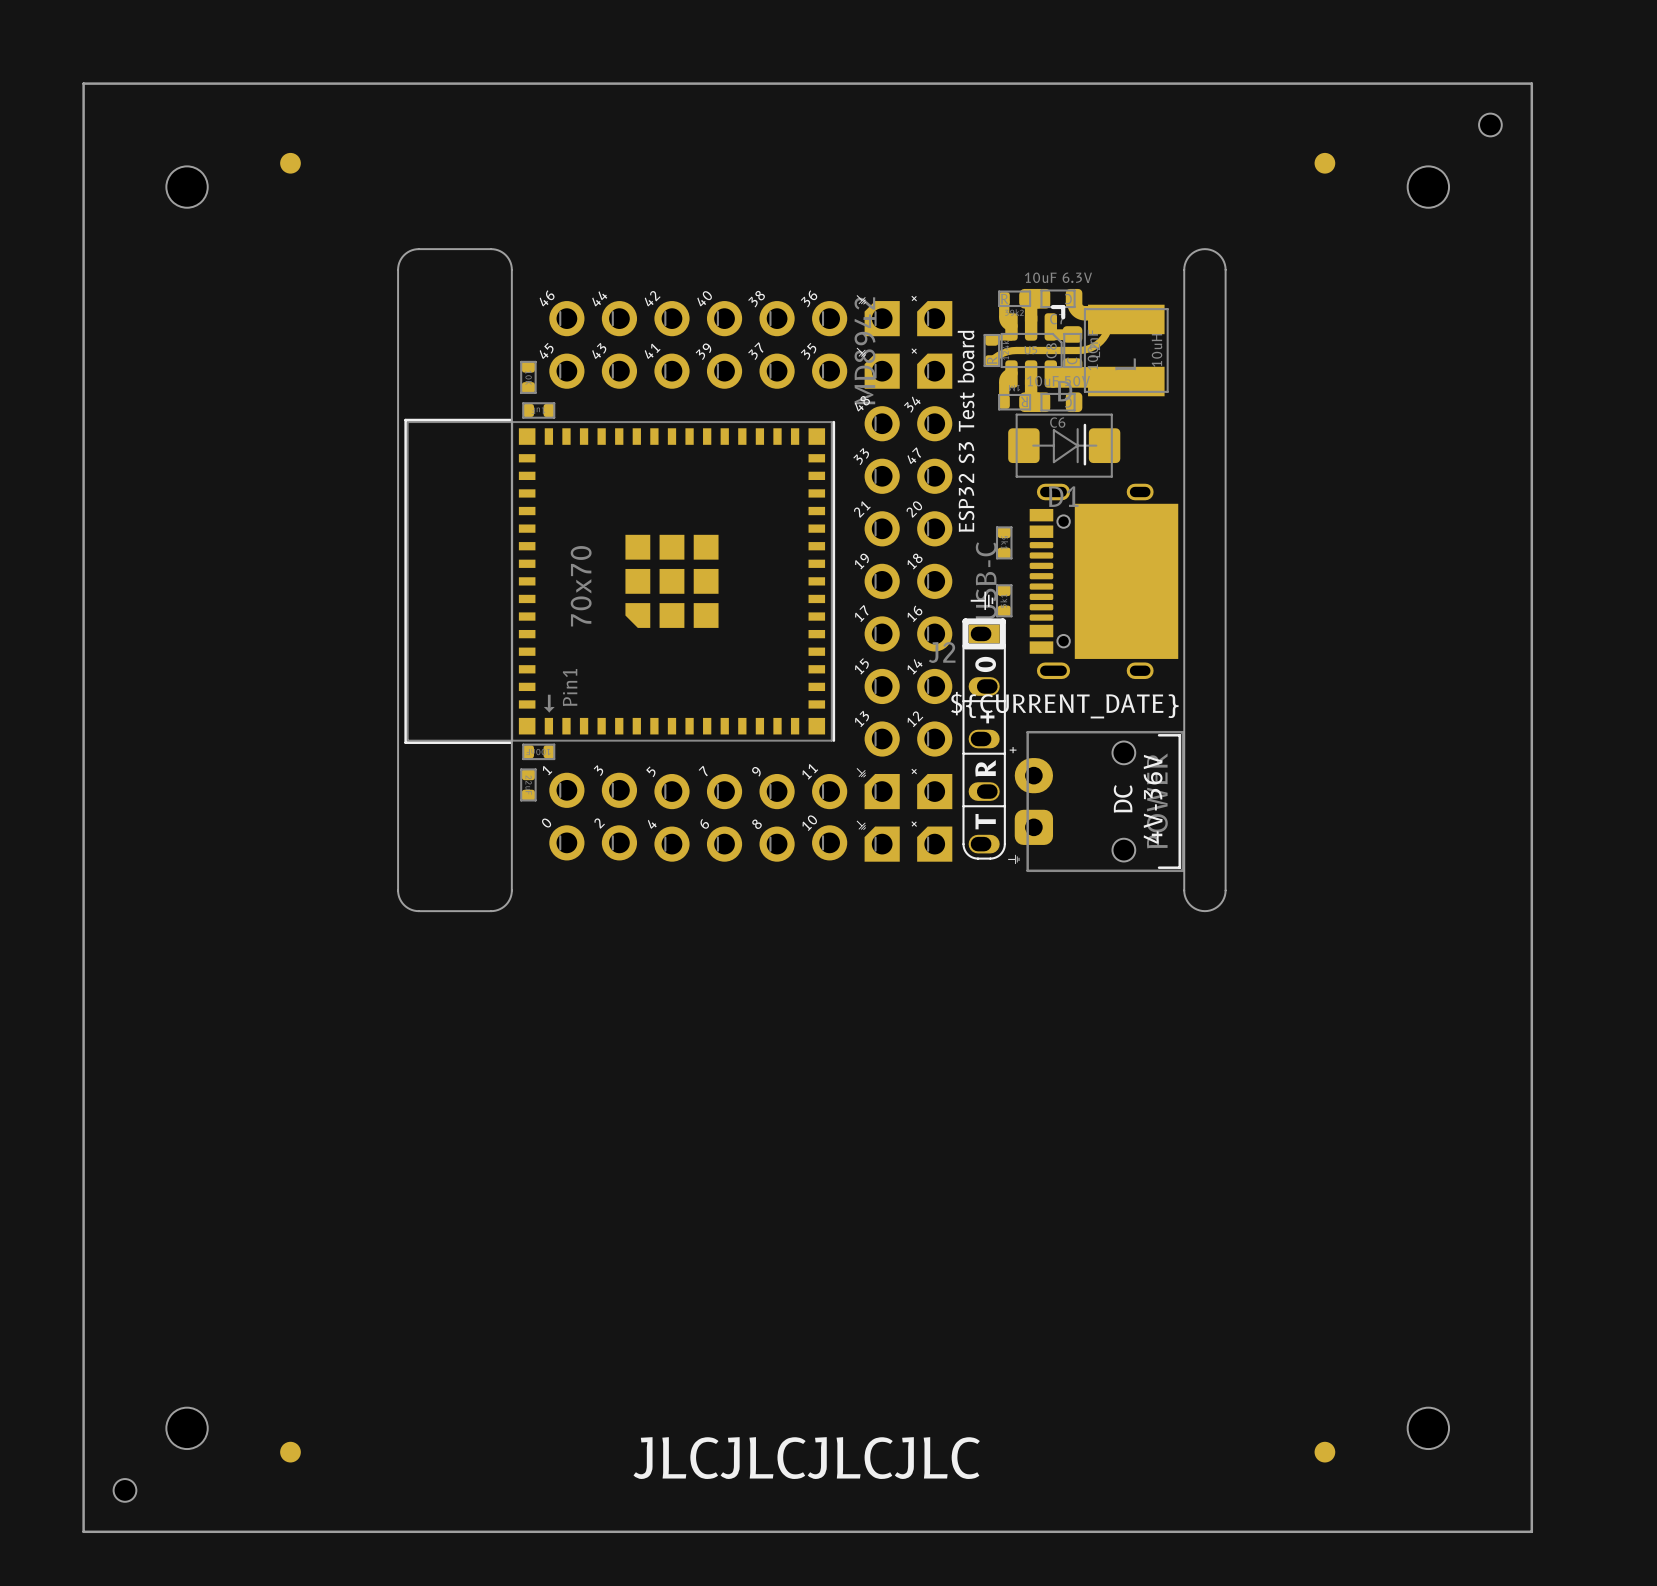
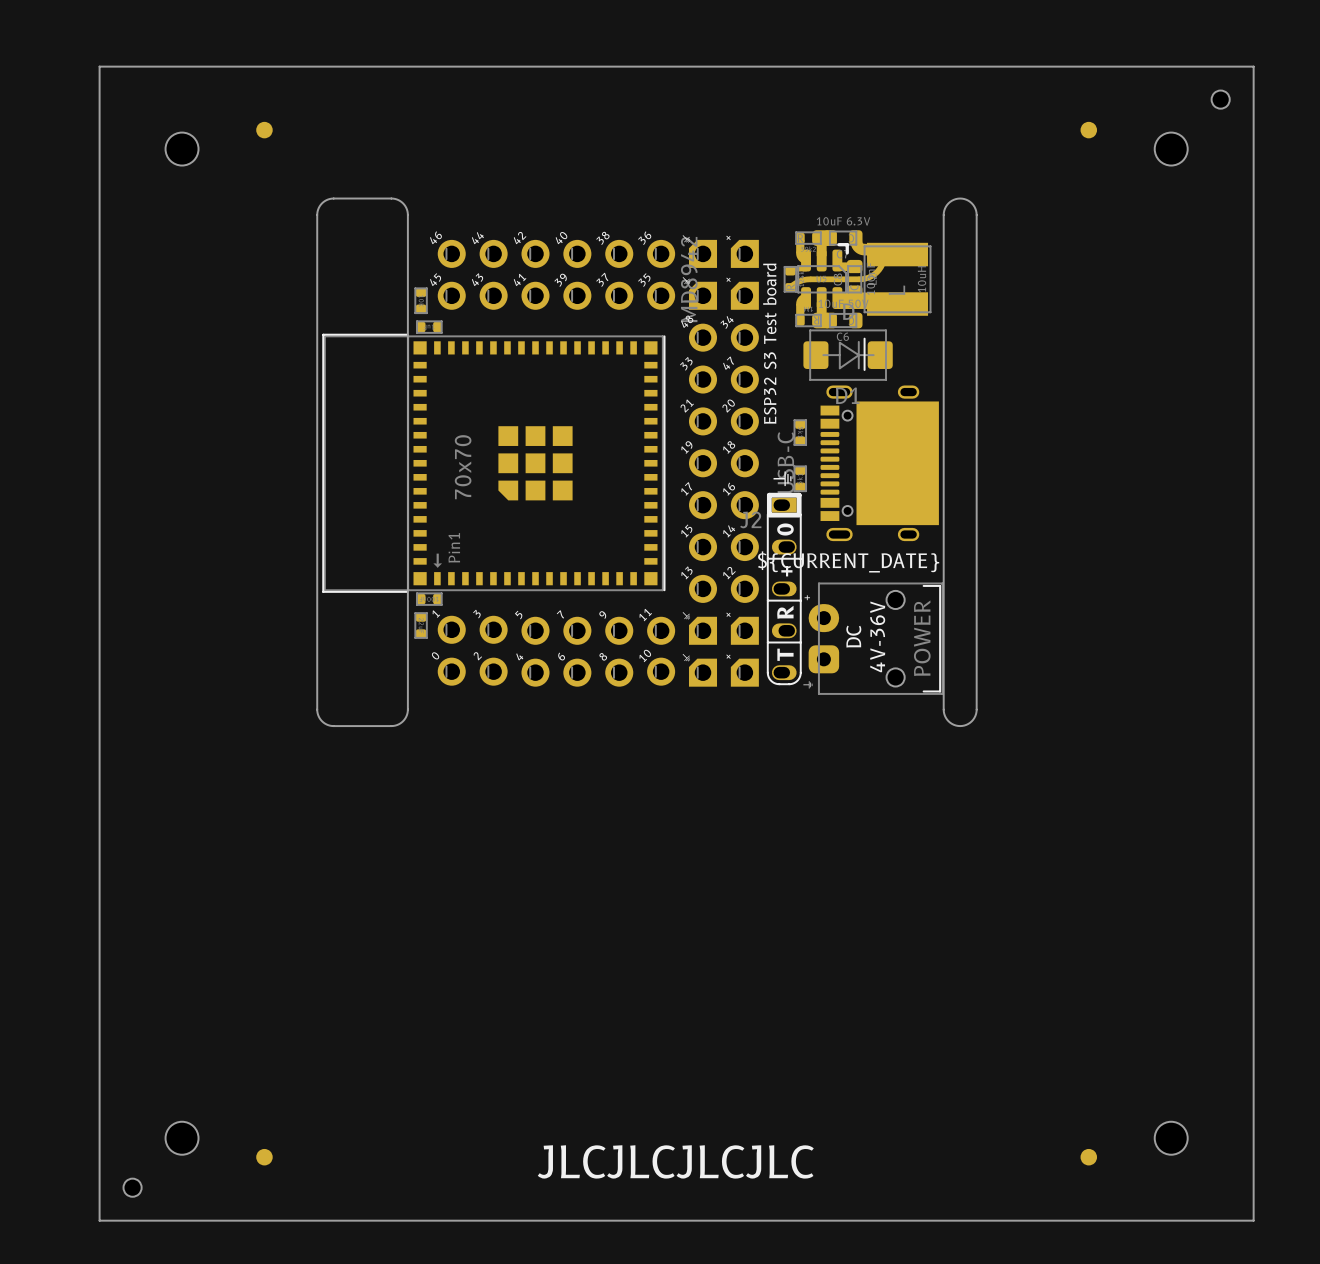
text position: DC (1123, 798) -> DC (853, 636)
text position: 4V-36V (1153, 799) -> 4V-36V (877, 636)
part position: (807, 807) -> (676, 643)

